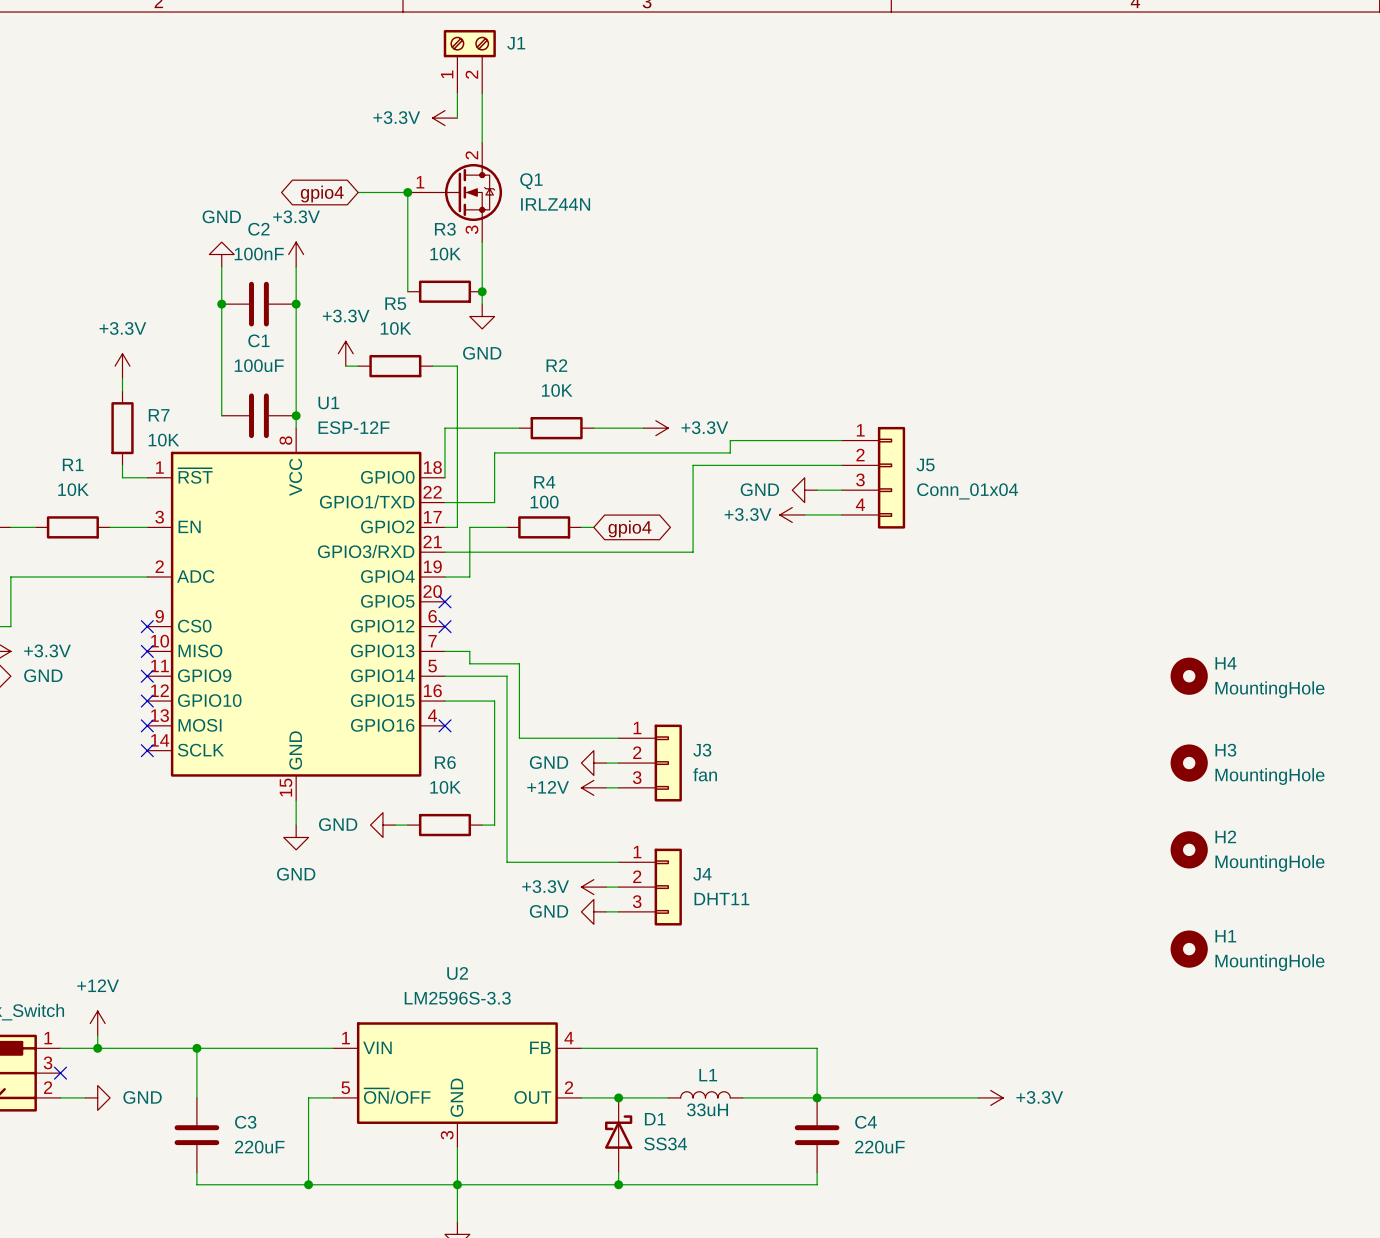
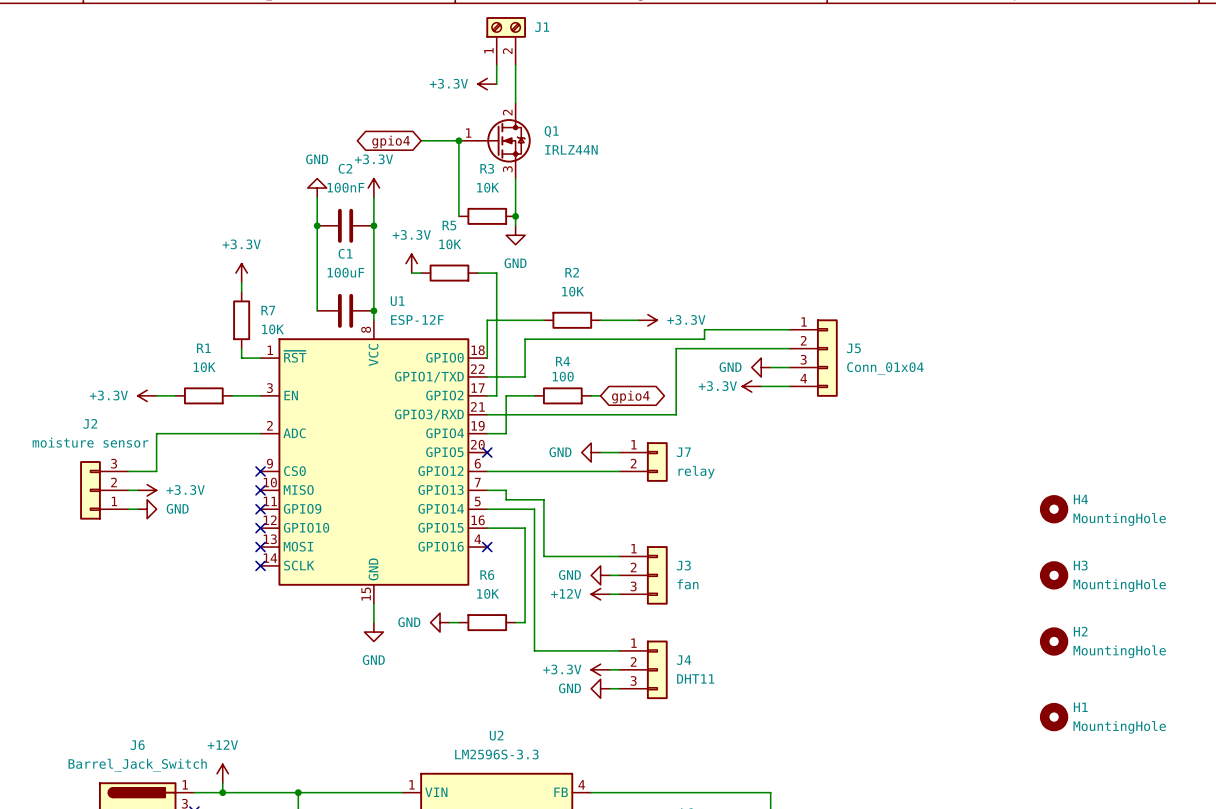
power symbol: none -> GND (591, 452)
wire: none -> (600, 452) (619, 452)
J7: none -> relay (643, 462)
wire: none -> (487, 471) (619, 471)
no-connect mark: (444, 626) -> none

